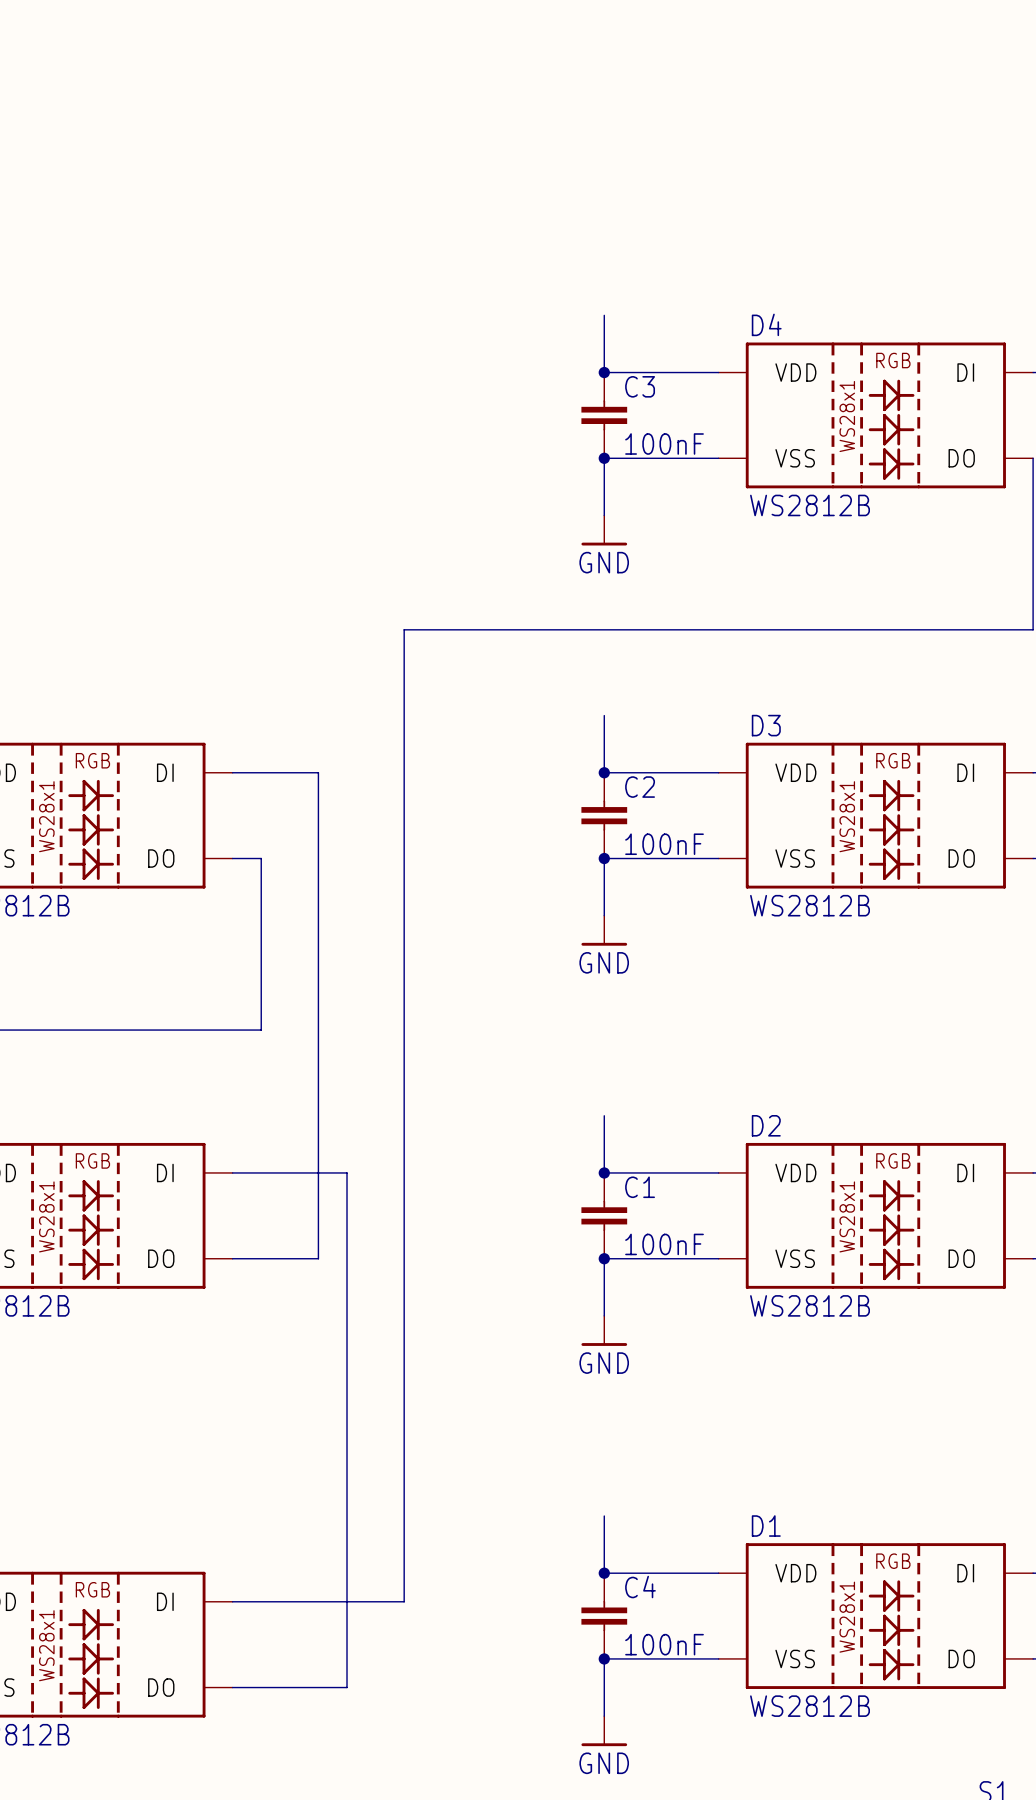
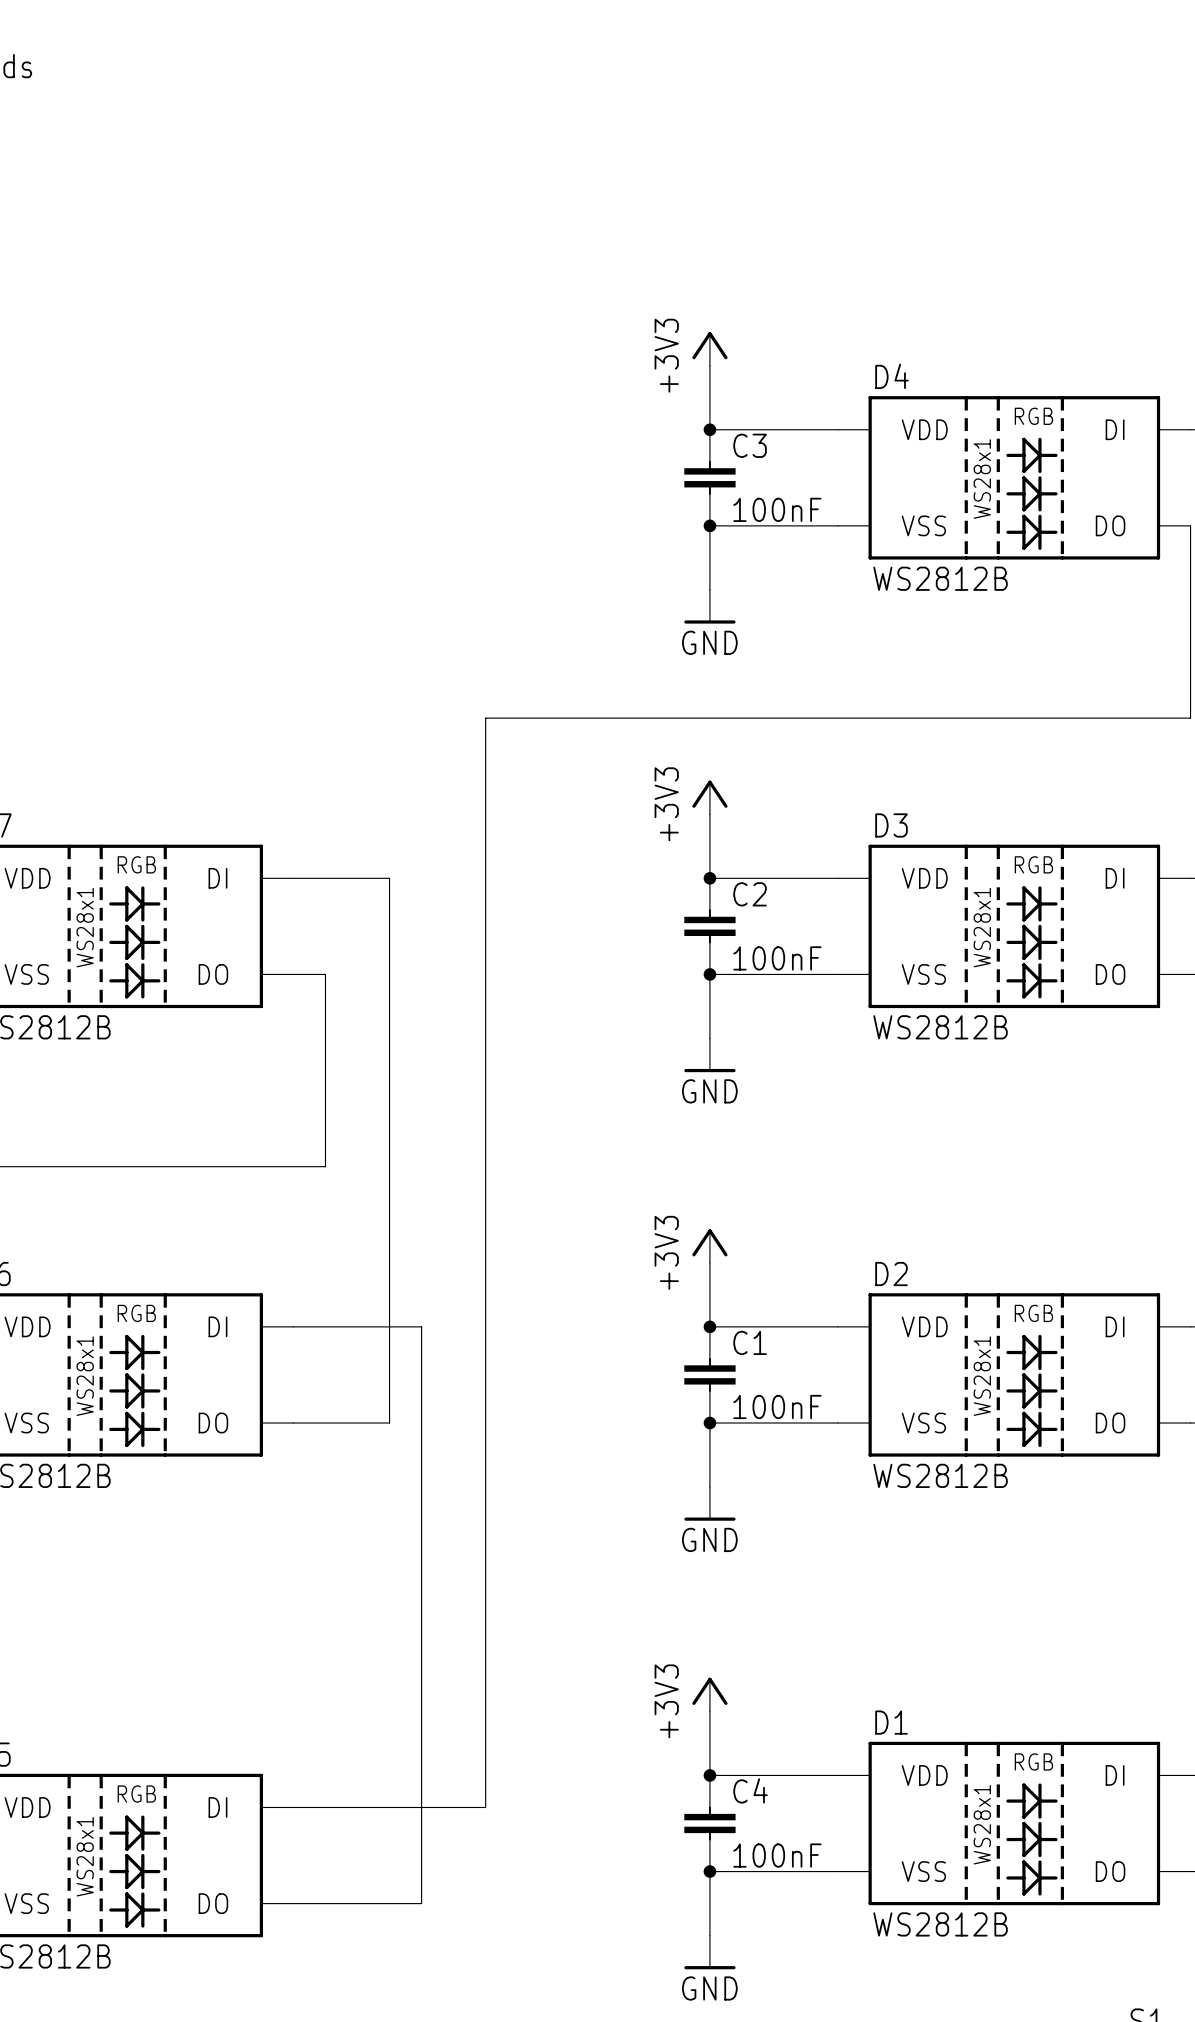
power symbol: none -> +3V3 (709, 348)
power symbol: none -> +3V3 (709, 797)
power symbol: none -> +3V3 (709, 1245)
power symbol: none -> +3V3 (709, 1694)

